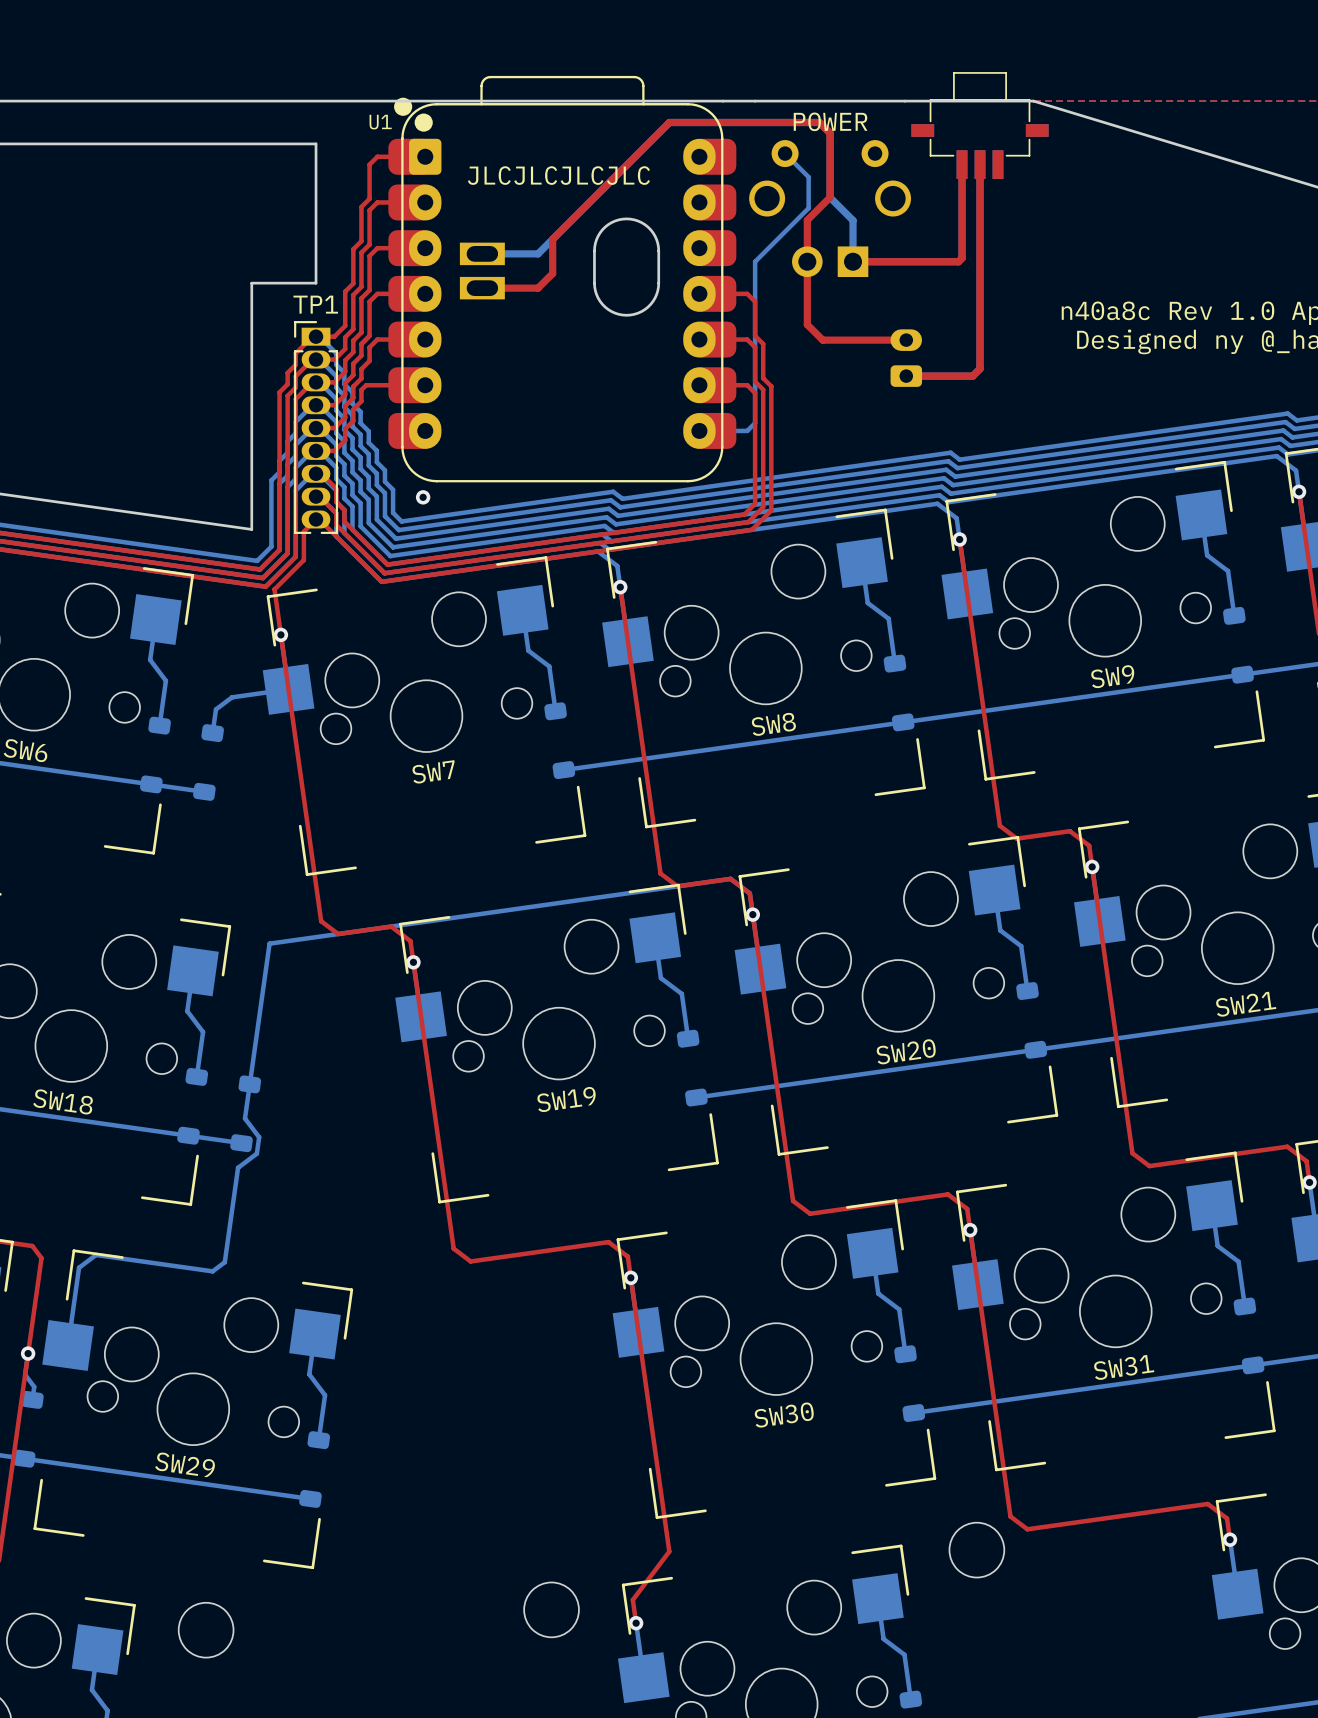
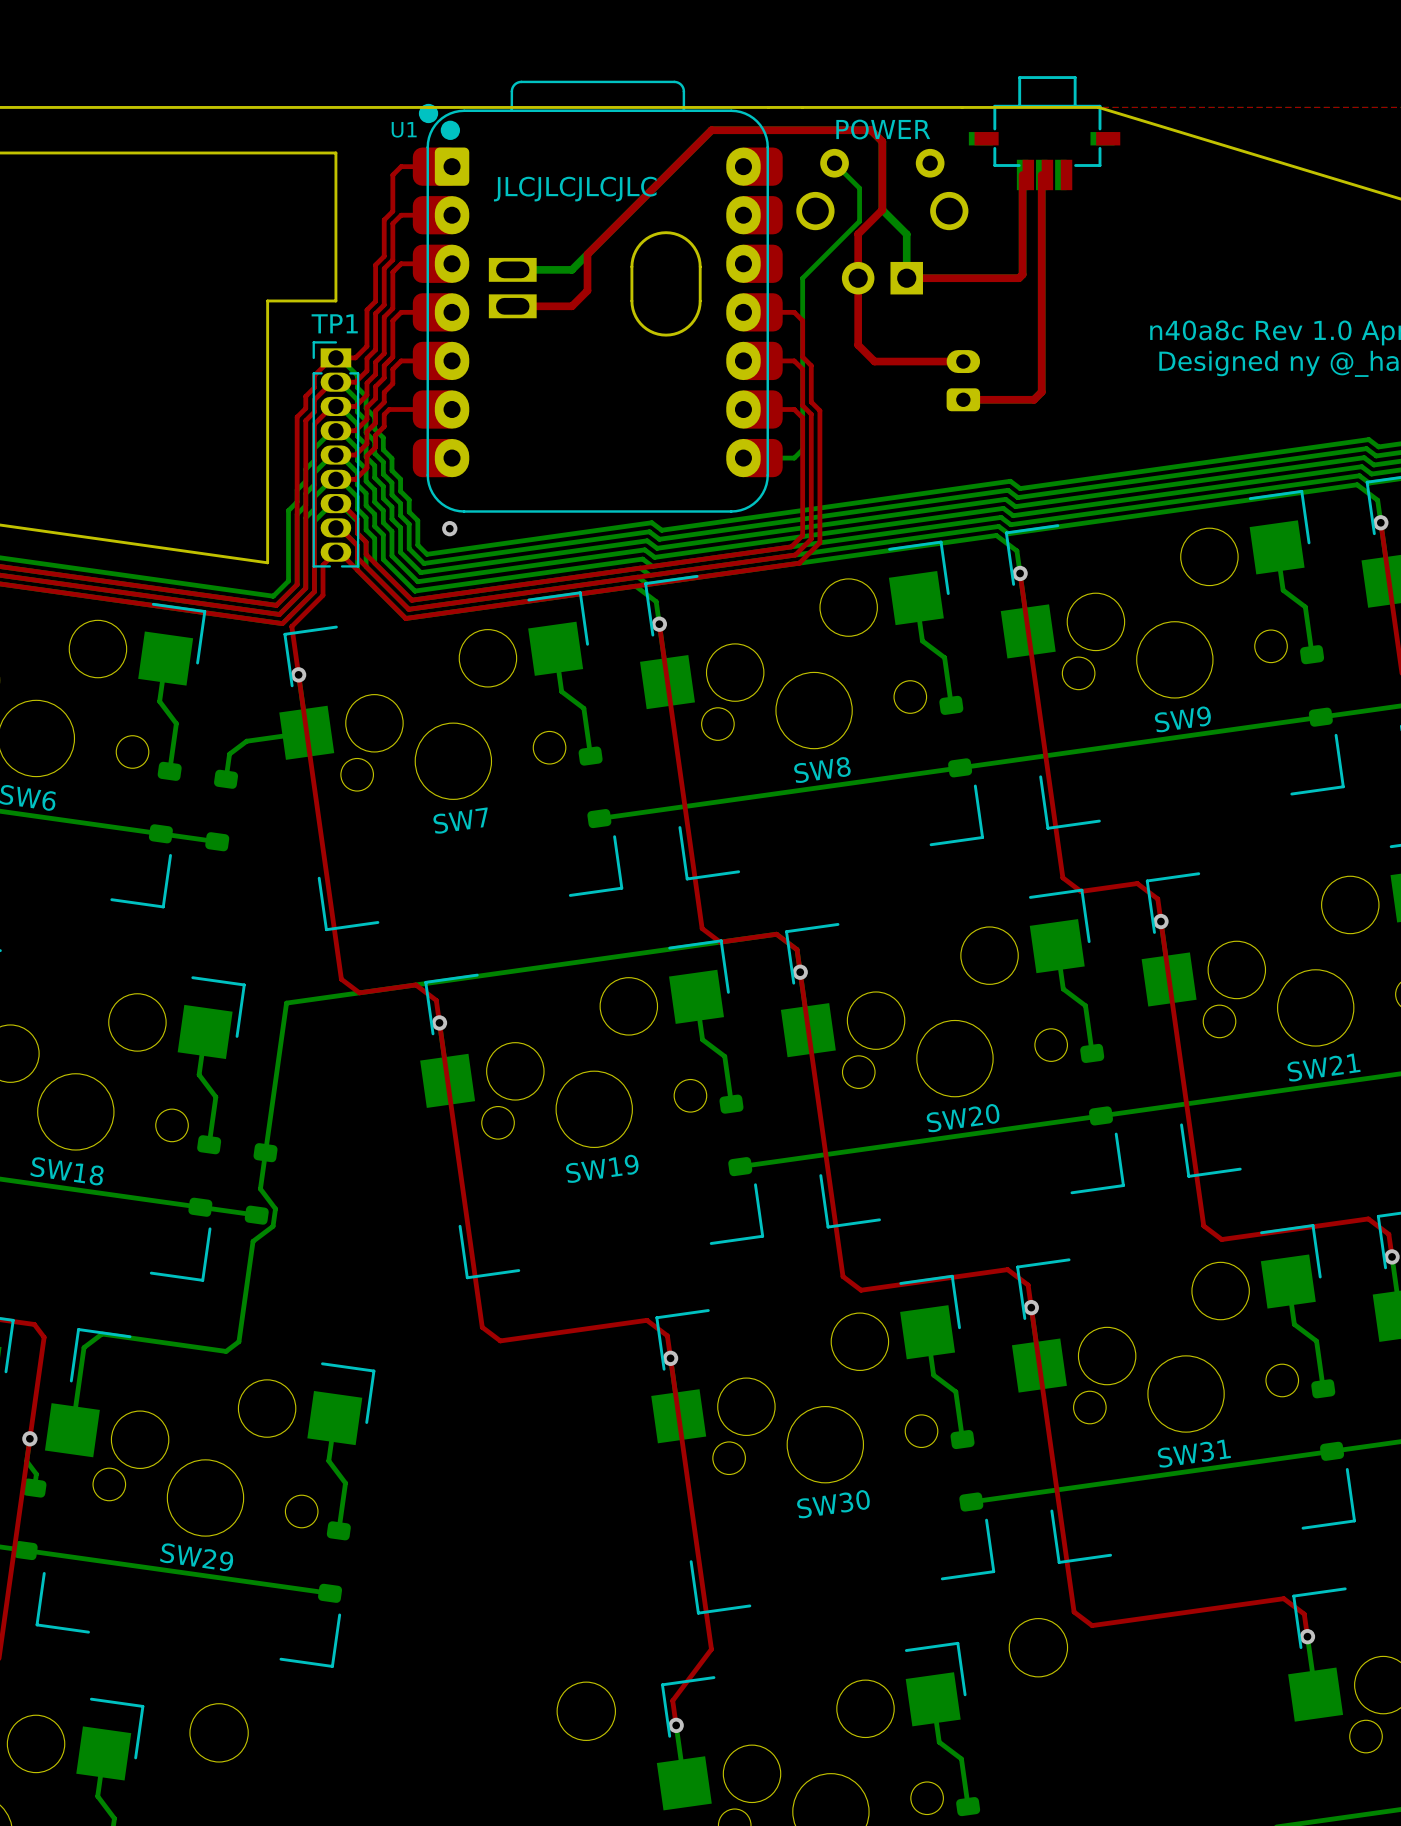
part footprint: [911, 72, 1049, 179] -> [974, 76, 1121, 191]

